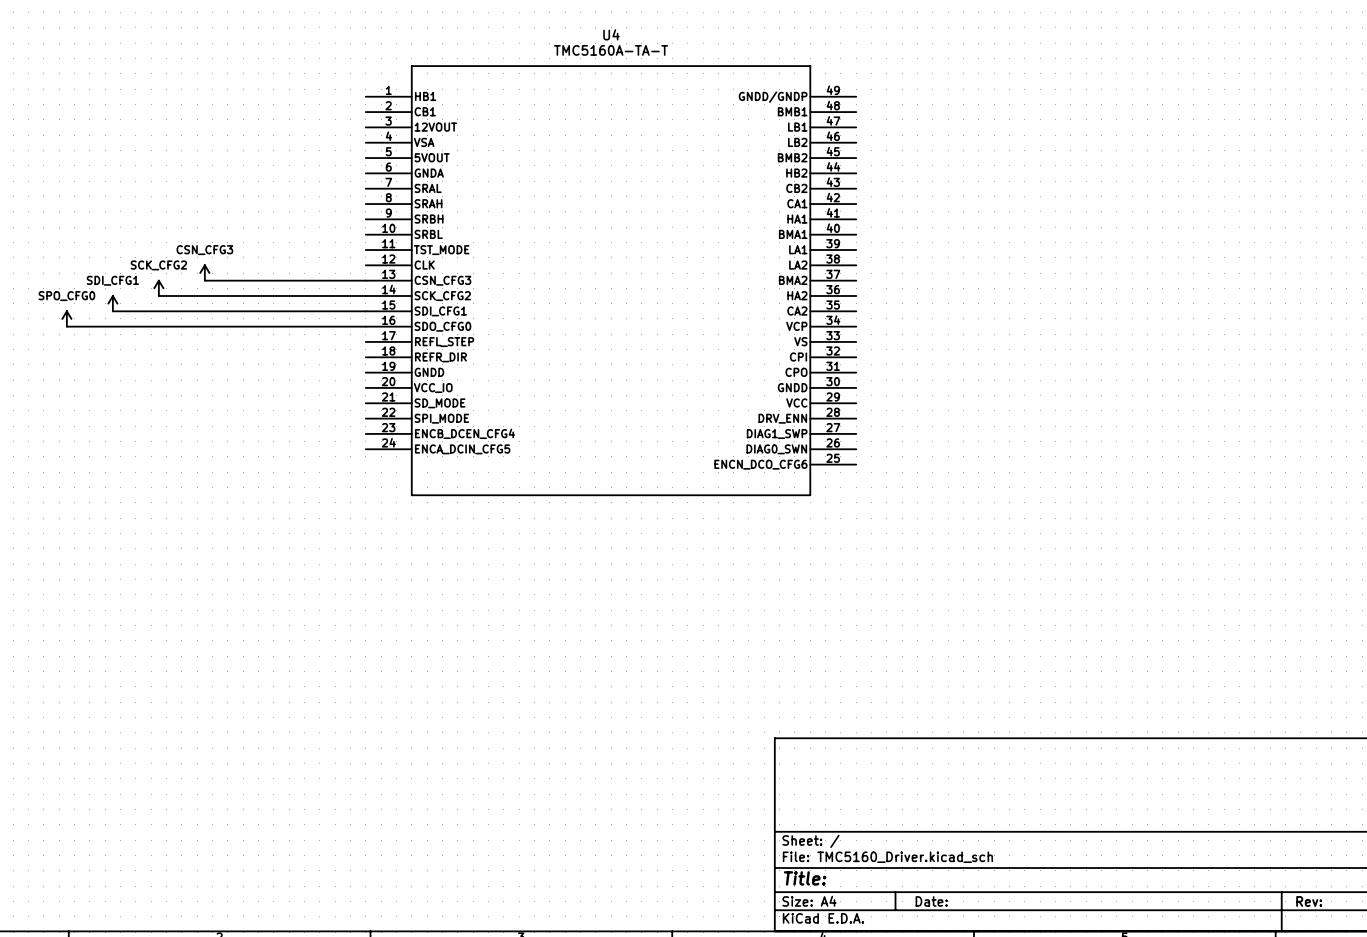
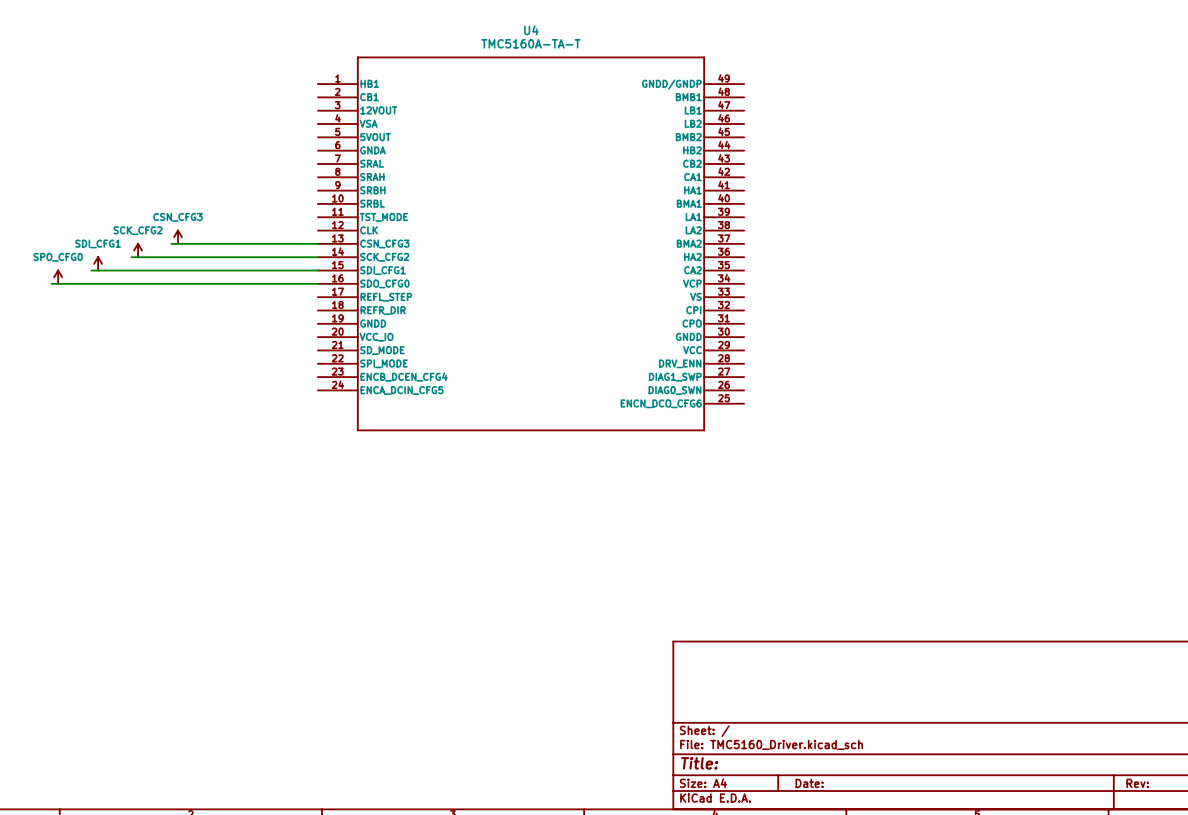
wire: none -> (171, 243) (178, 243)
wire: none -> (131, 257) (138, 257)
wire: none -> (91, 270) (98, 270)
wire: none -> (51, 283) (58, 283)

